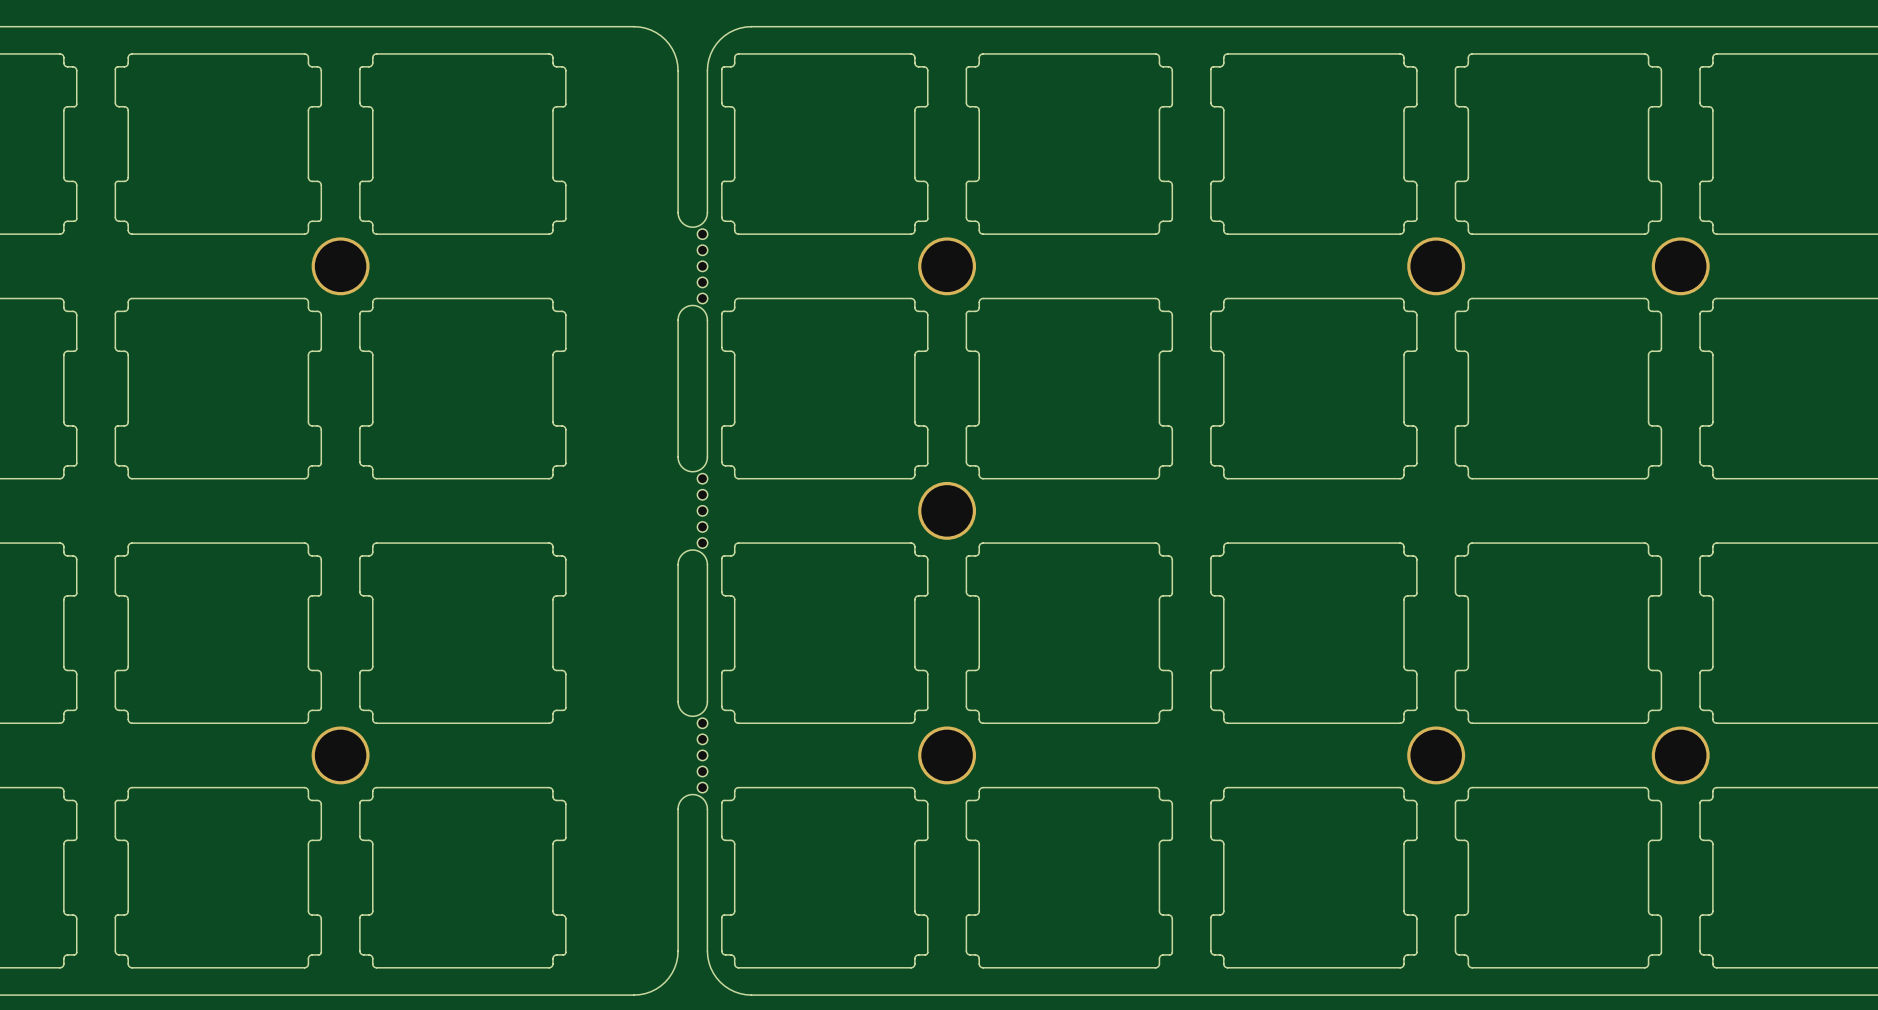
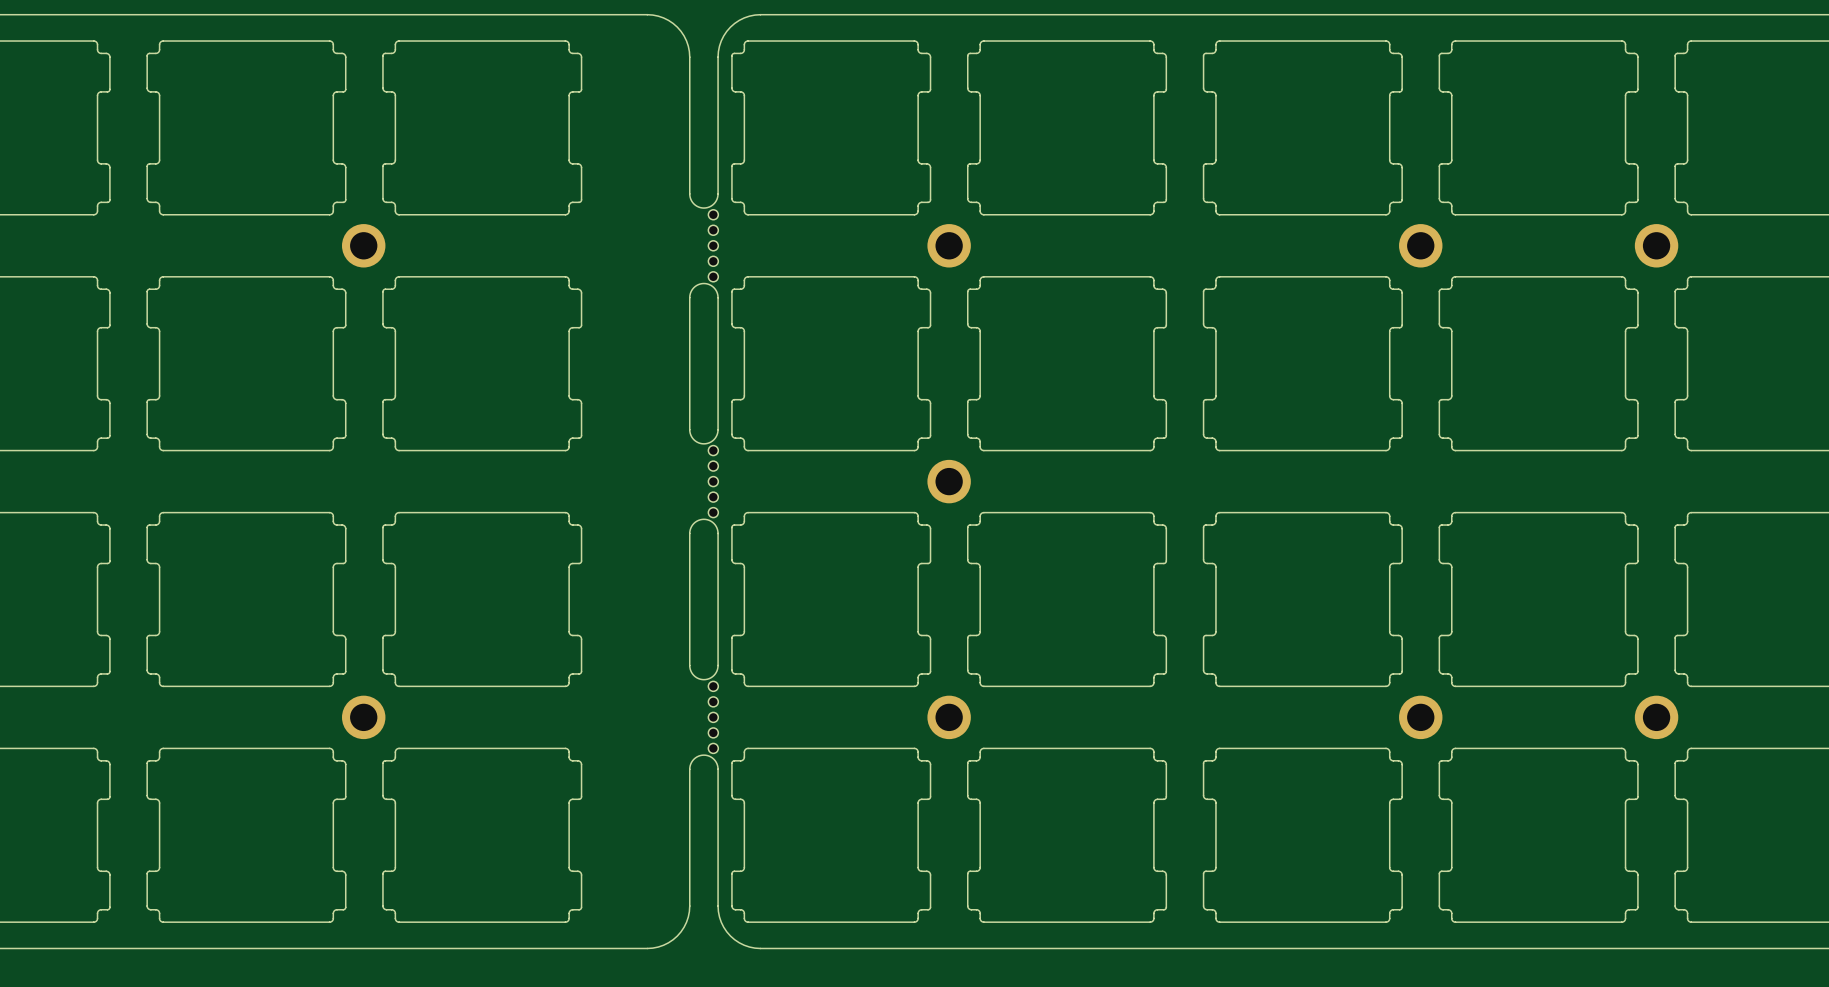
part footprint: [311, 237, 370, 296] -> [342, 224, 386, 268]
part footprint: [918, 237, 977, 296] -> [927, 224, 971, 268]
part footprint: [1407, 237, 1466, 296] -> [1399, 224, 1443, 268]
part footprint: [1651, 237, 1710, 296] -> [1634, 224, 1679, 268]
part footprint: [918, 481, 977, 540] -> [927, 459, 971, 504]
part footprint: [311, 726, 370, 785] -> [342, 695, 386, 740]
part footprint: [918, 726, 977, 785] -> [927, 695, 971, 740]
part footprint: [1407, 726, 1466, 785] -> [1399, 695, 1443, 740]
part footprint: [1651, 726, 1710, 785] -> [1634, 695, 1679, 740]

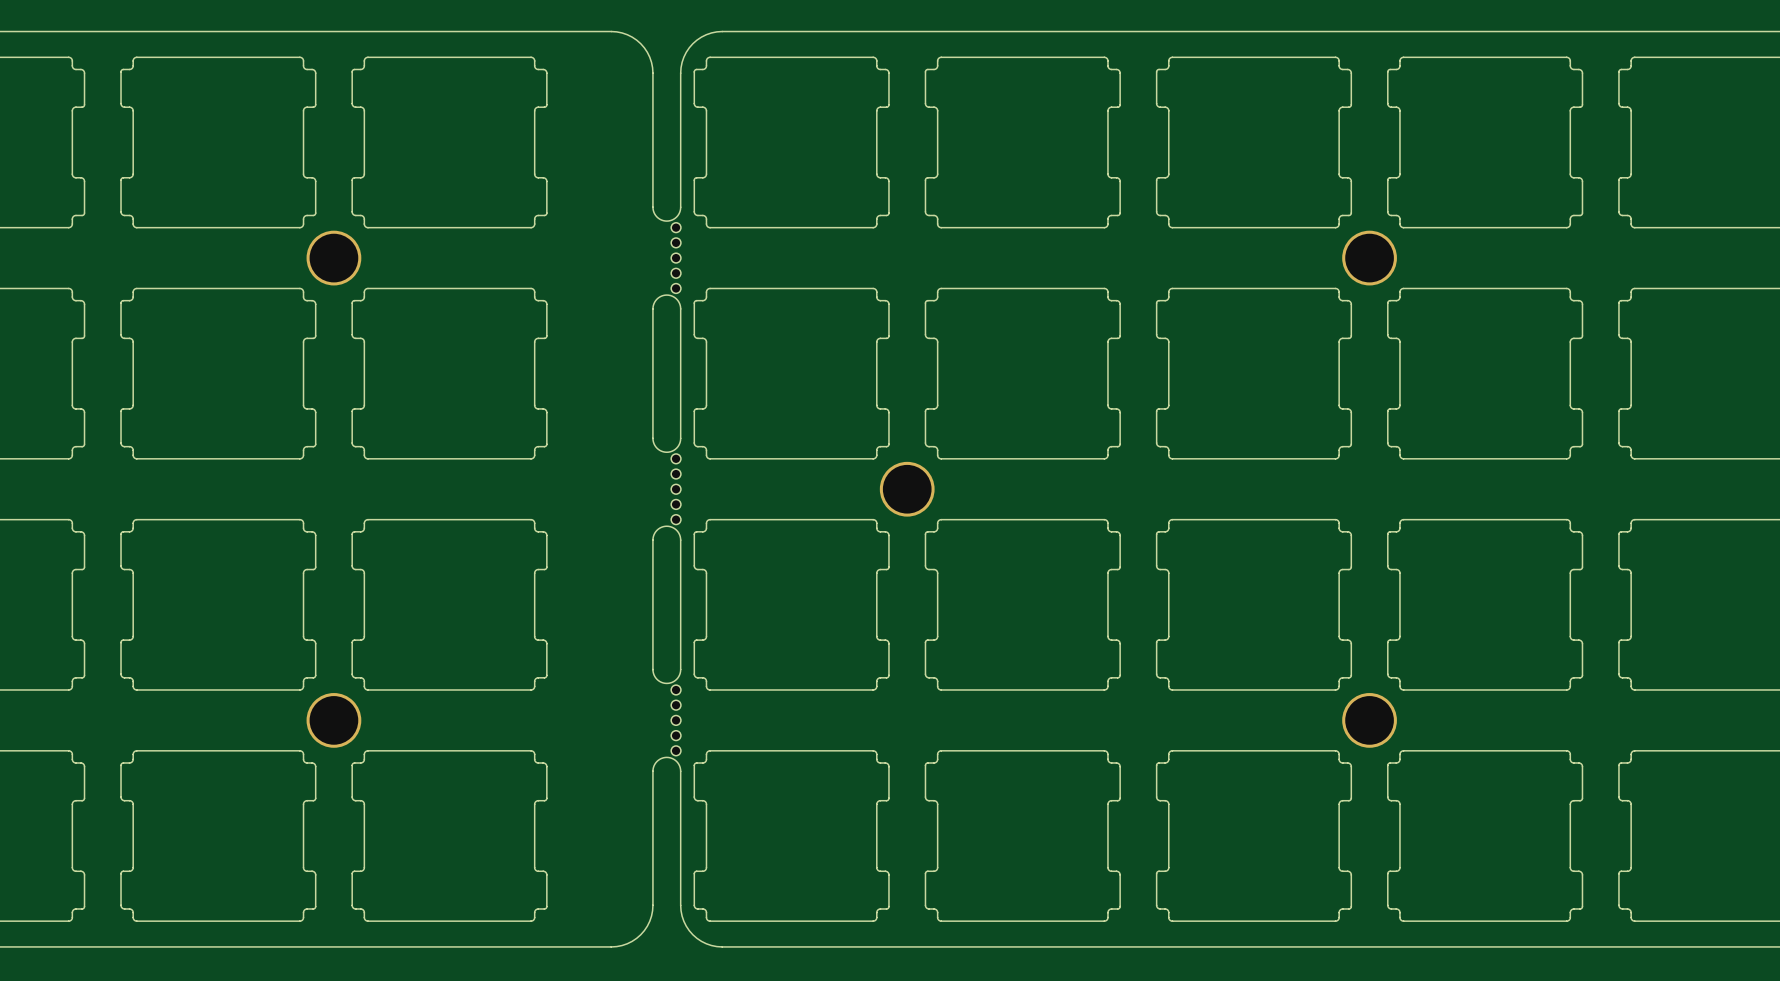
part footprint: [342, 224, 386, 268] -> [306, 230, 362, 286]
part footprint: [1399, 224, 1443, 268] -> [1342, 230, 1397, 286]
part: (949, 245) -> none
part: (1656, 245) -> none
part footprint: [927, 459, 971, 504] -> [879, 461, 935, 517]
part footprint: [342, 695, 386, 740] -> [306, 693, 362, 748]
part footprint: [1399, 695, 1443, 740] -> [1342, 693, 1397, 748]
part: (949, 717) -> none
part: (1656, 717) -> none

